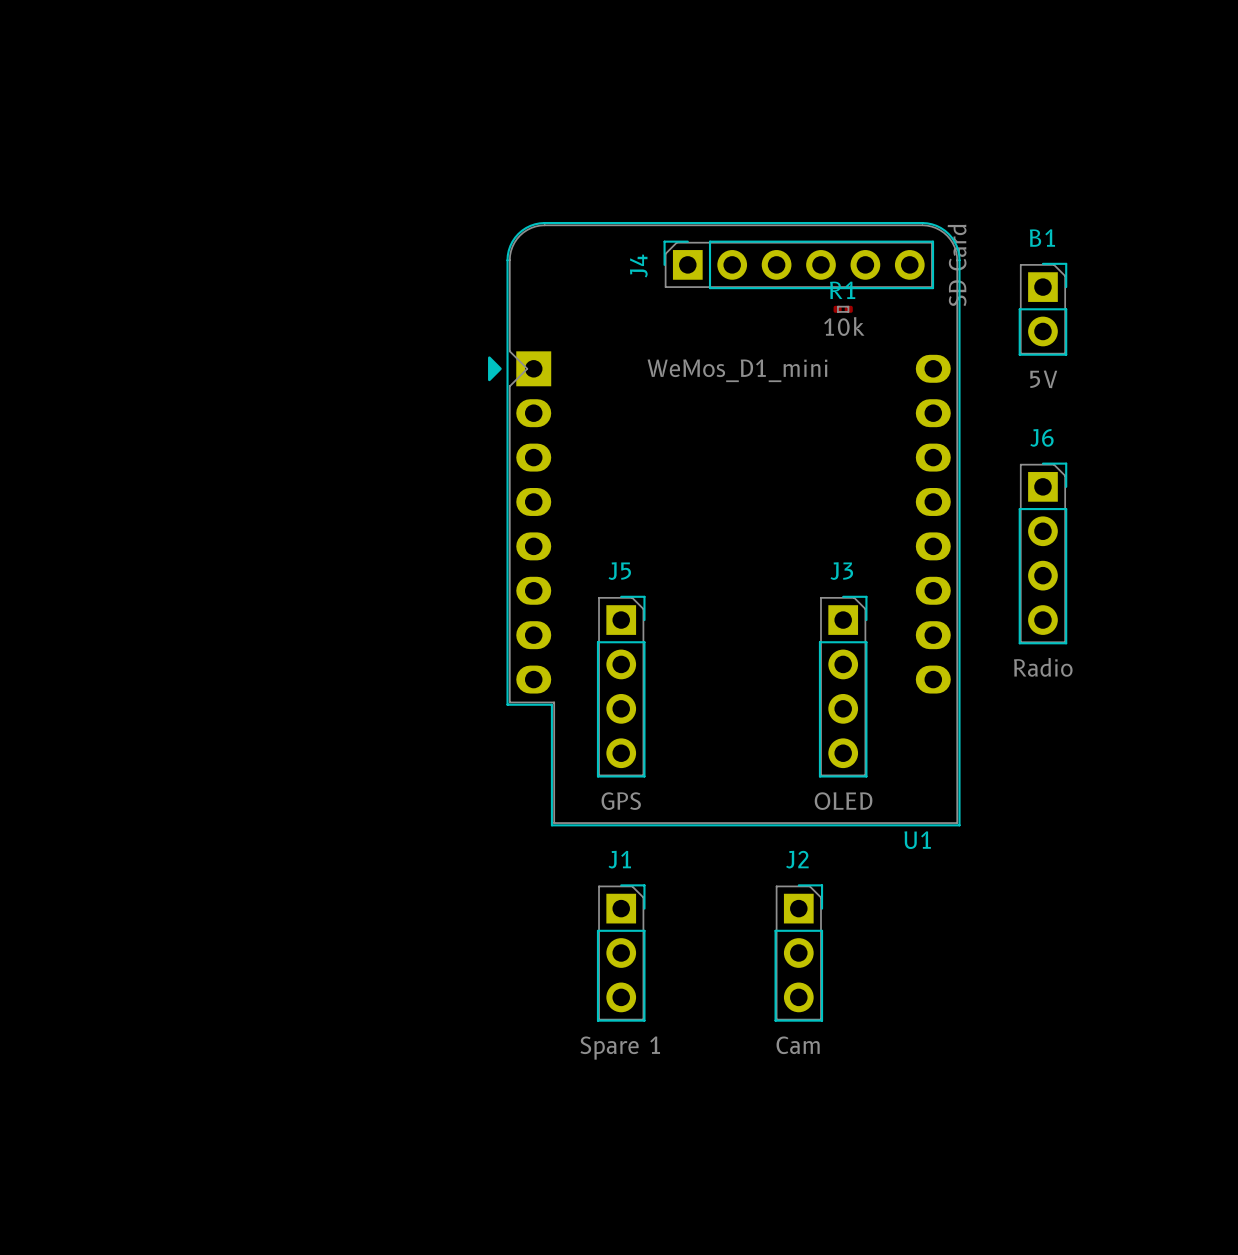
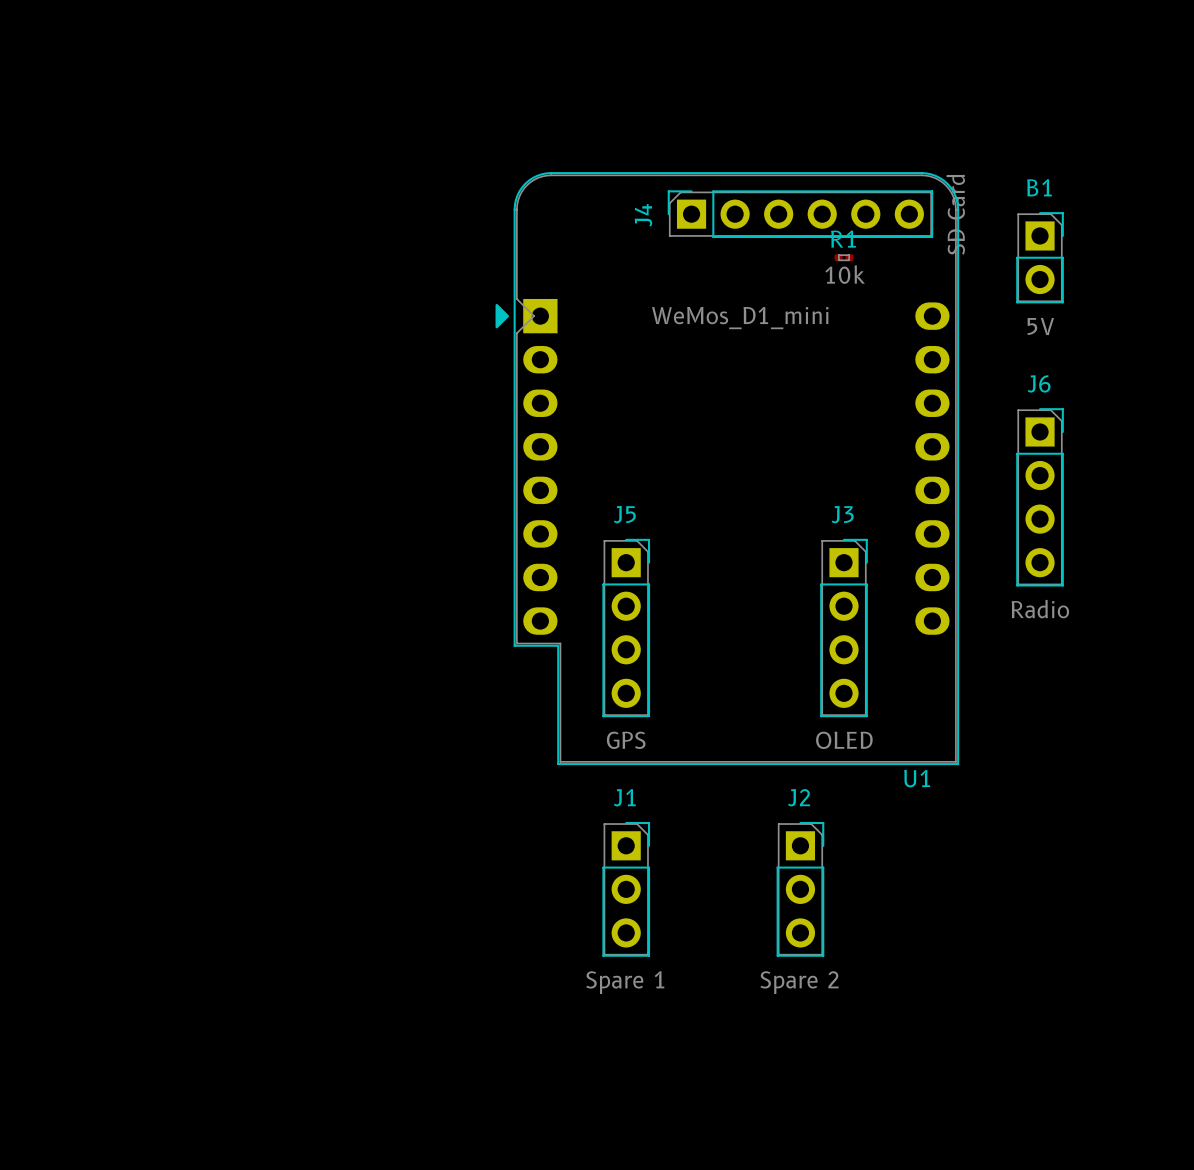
J2 value: Cam (798, 1045) -> Spare 2 (799, 982)

